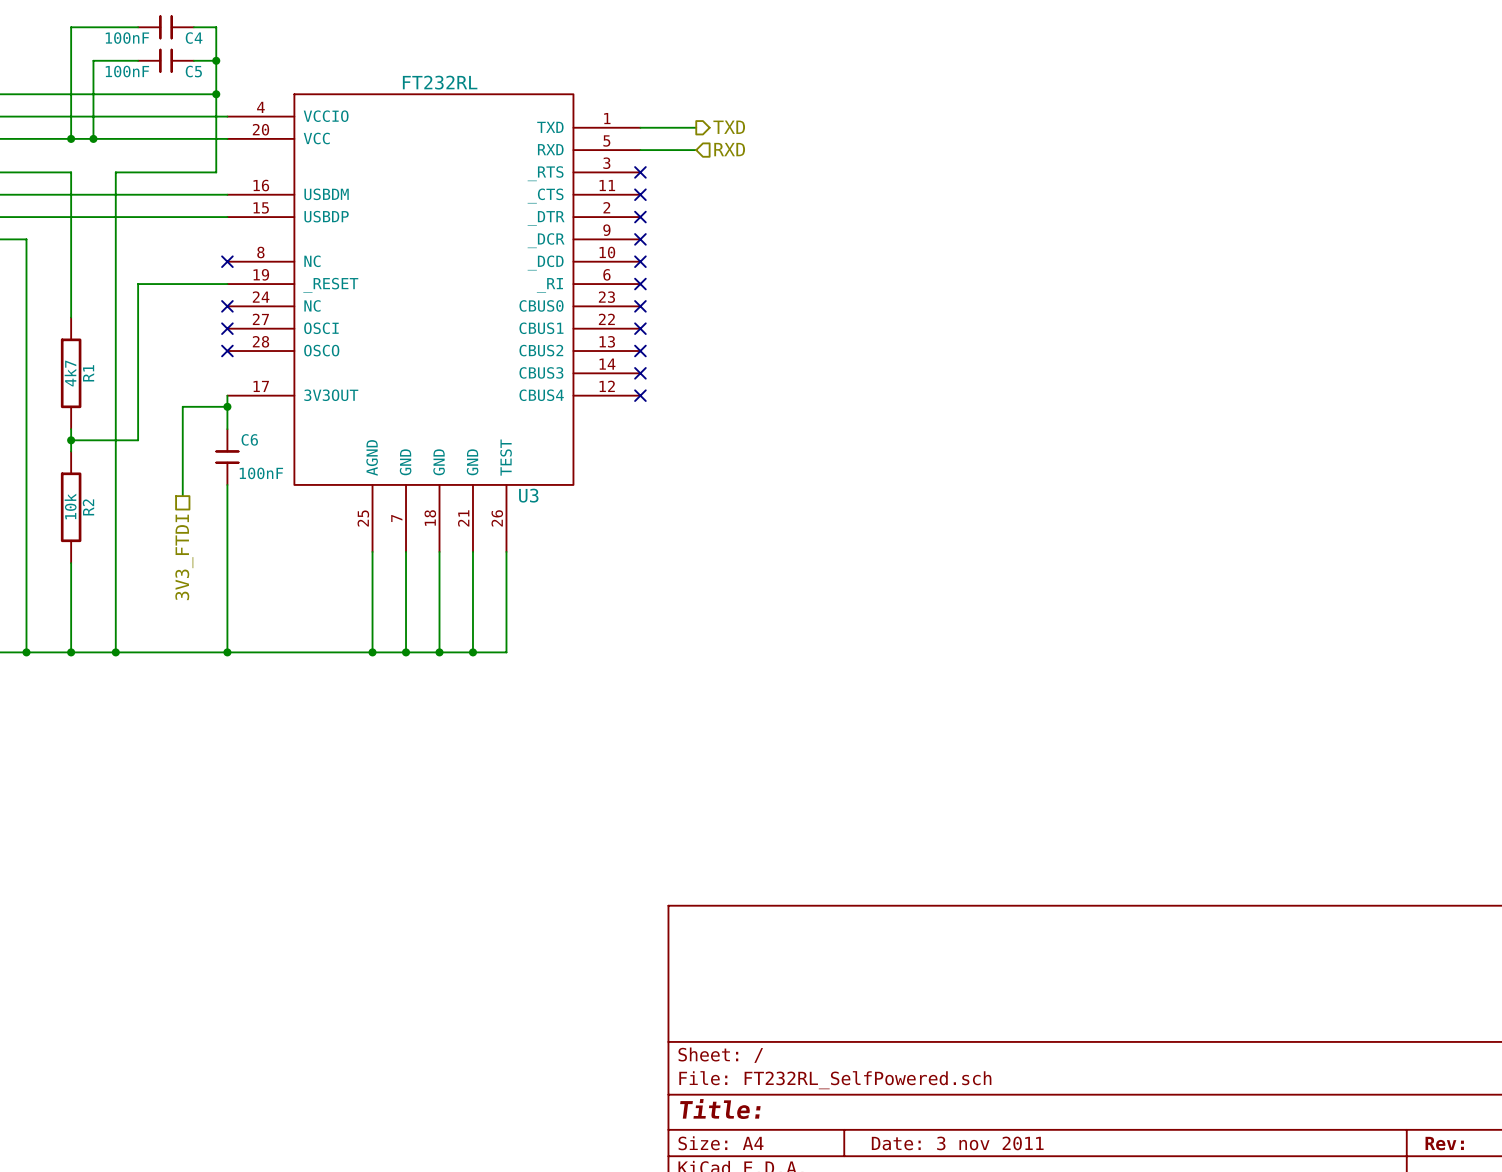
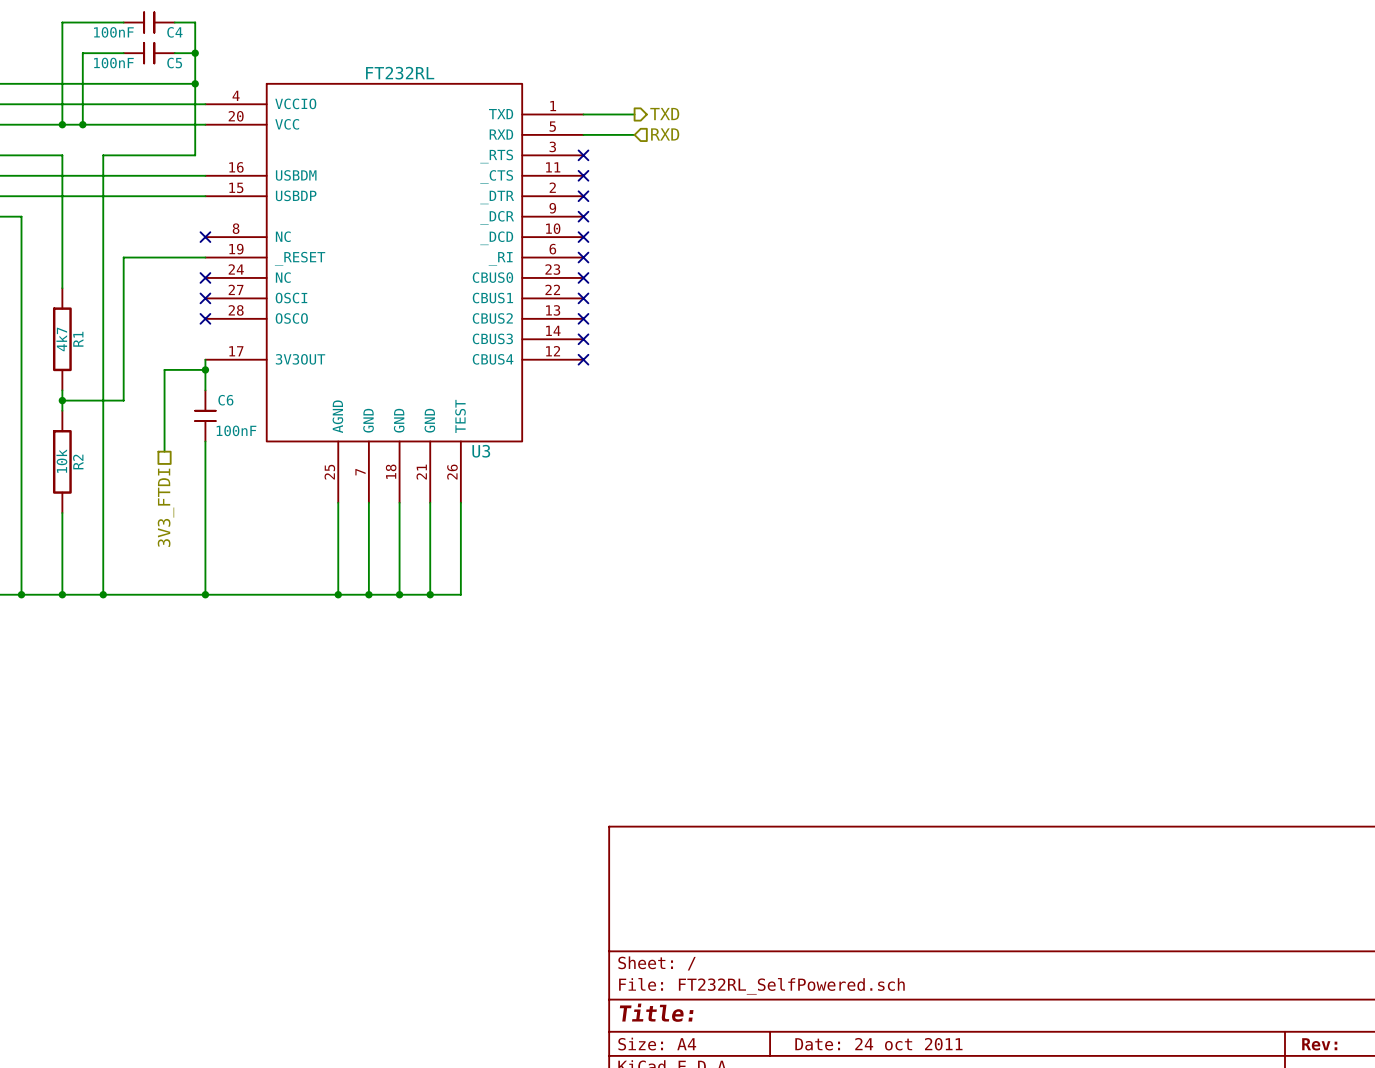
title block: Date: 3 nov 2011 (957, 1143) -> Date: 24 oct 2011 (878, 1044)

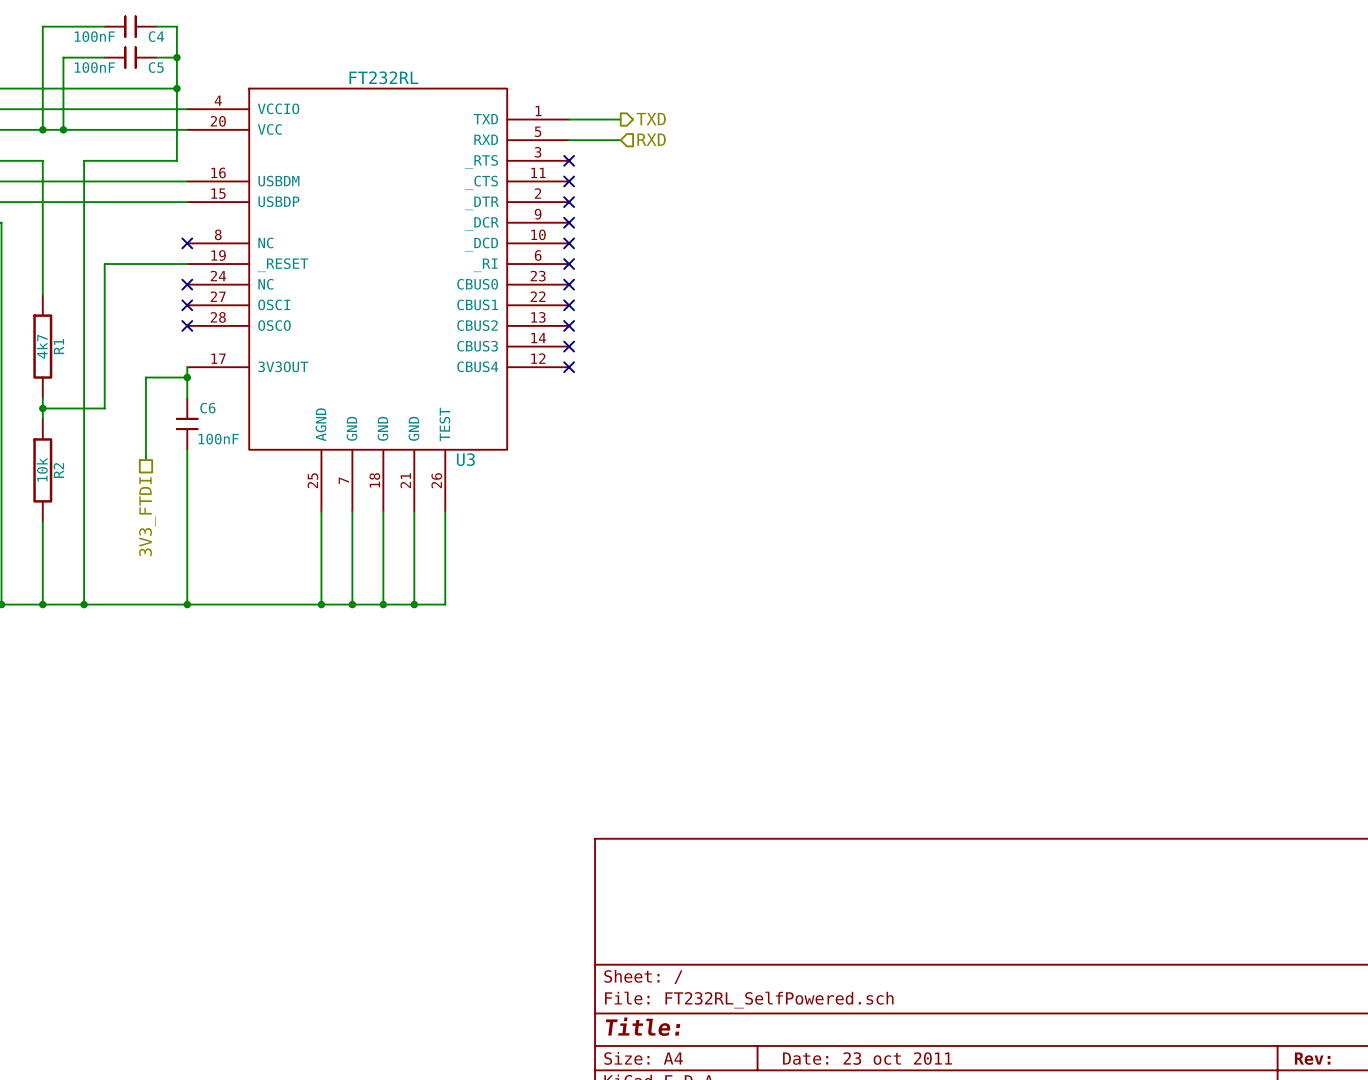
title block: Date: 24 oct 2011 (878, 1044) -> Date: 23 oct 2011 (867, 1058)

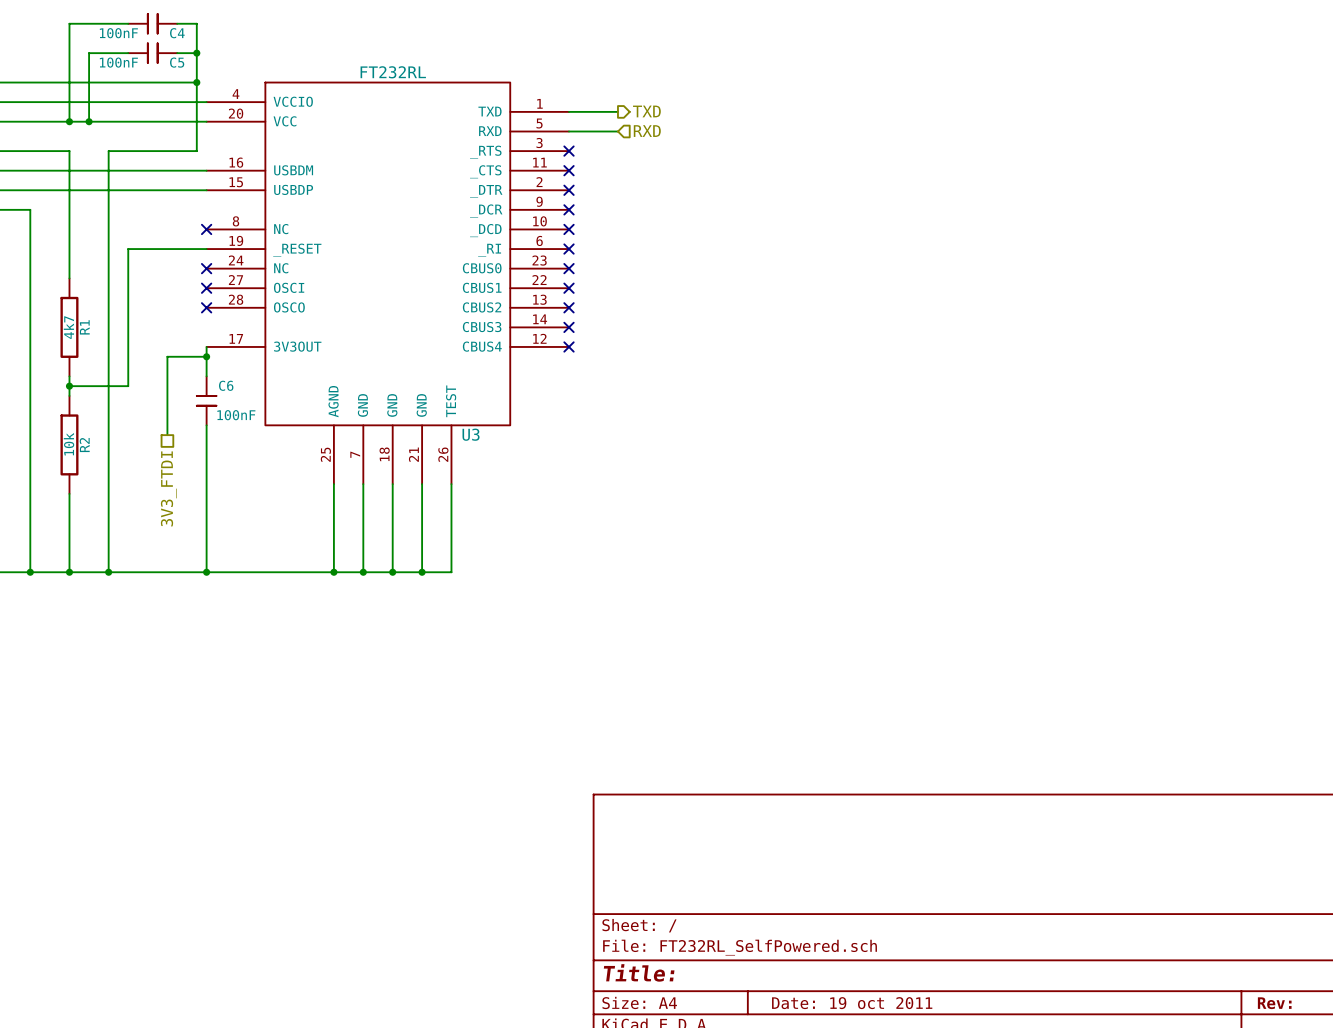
title block: Date: 23 oct 2011 (867, 1058) -> Date: 19 oct 2011 (852, 1003)

